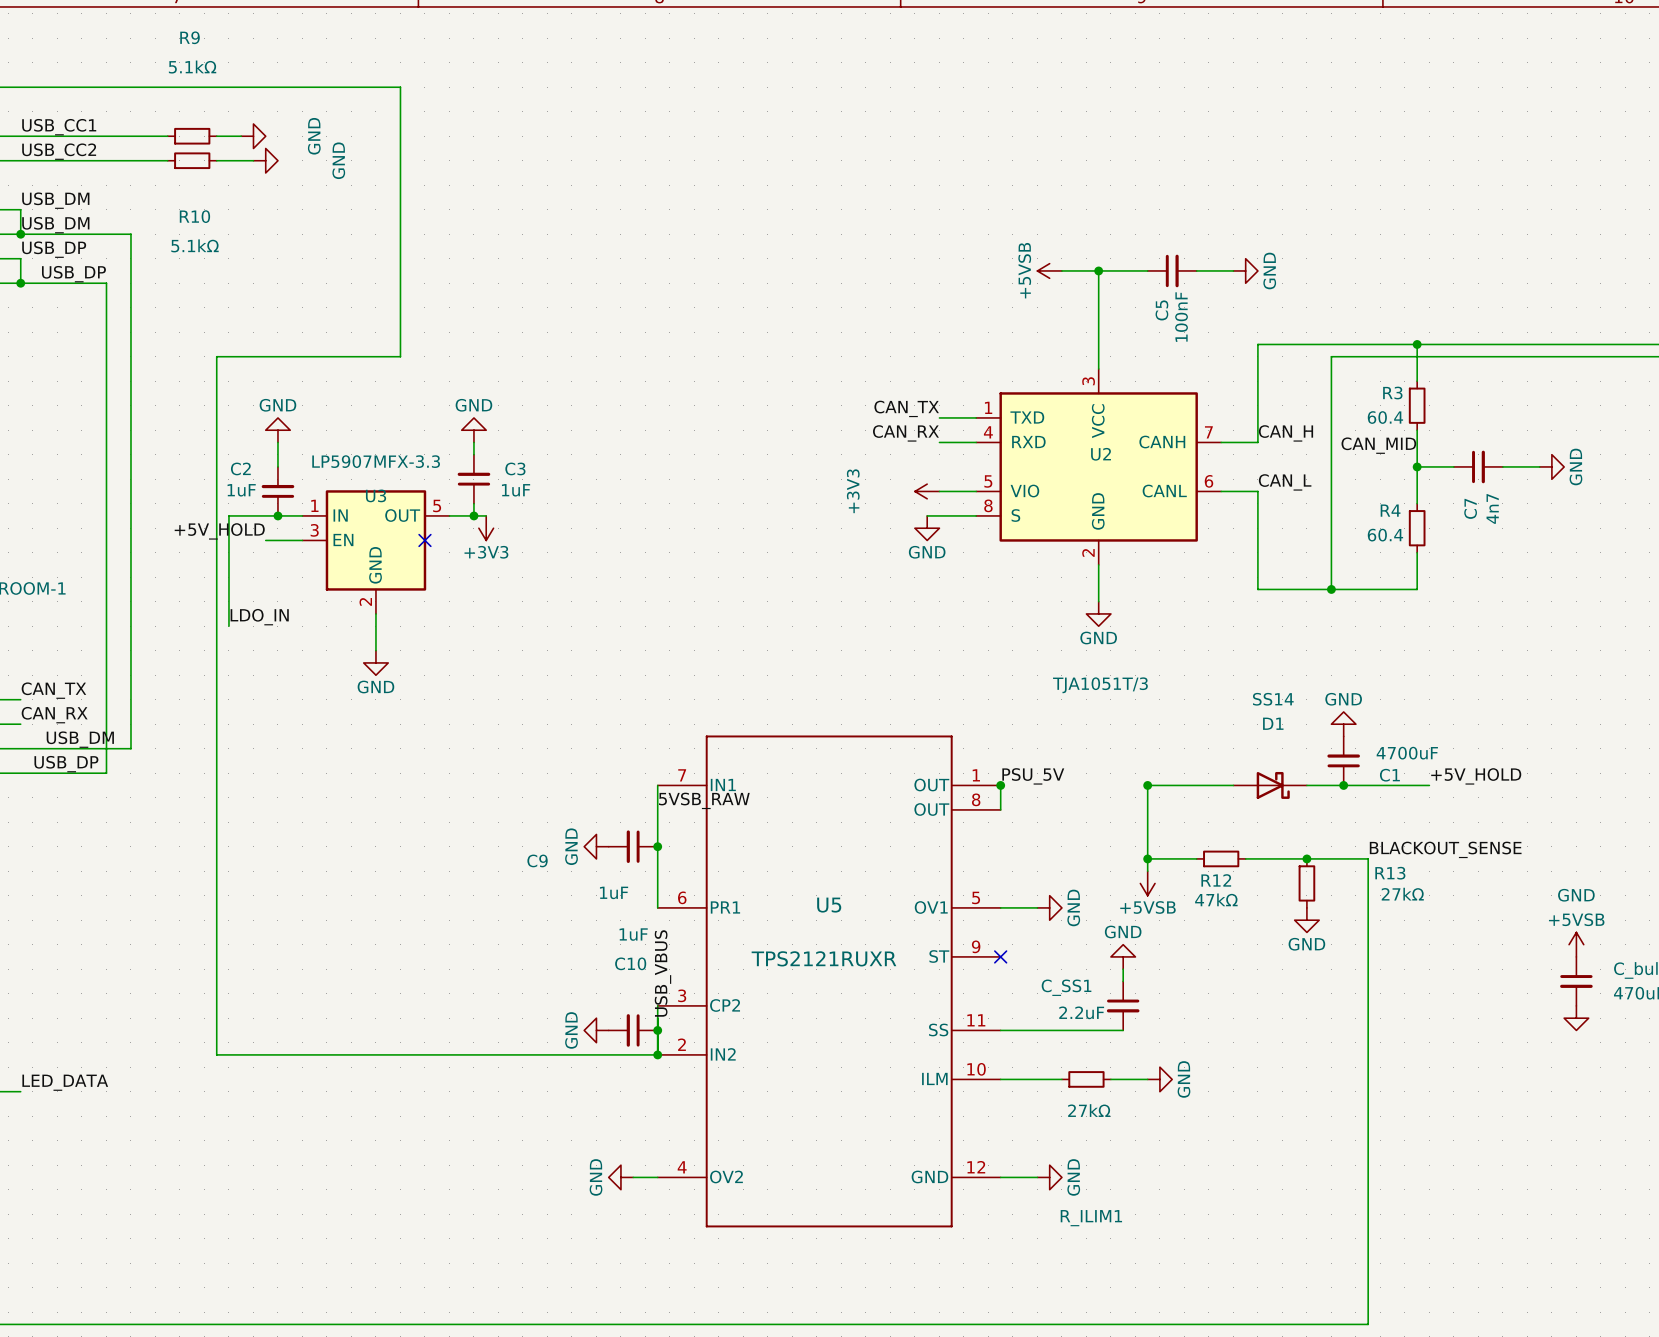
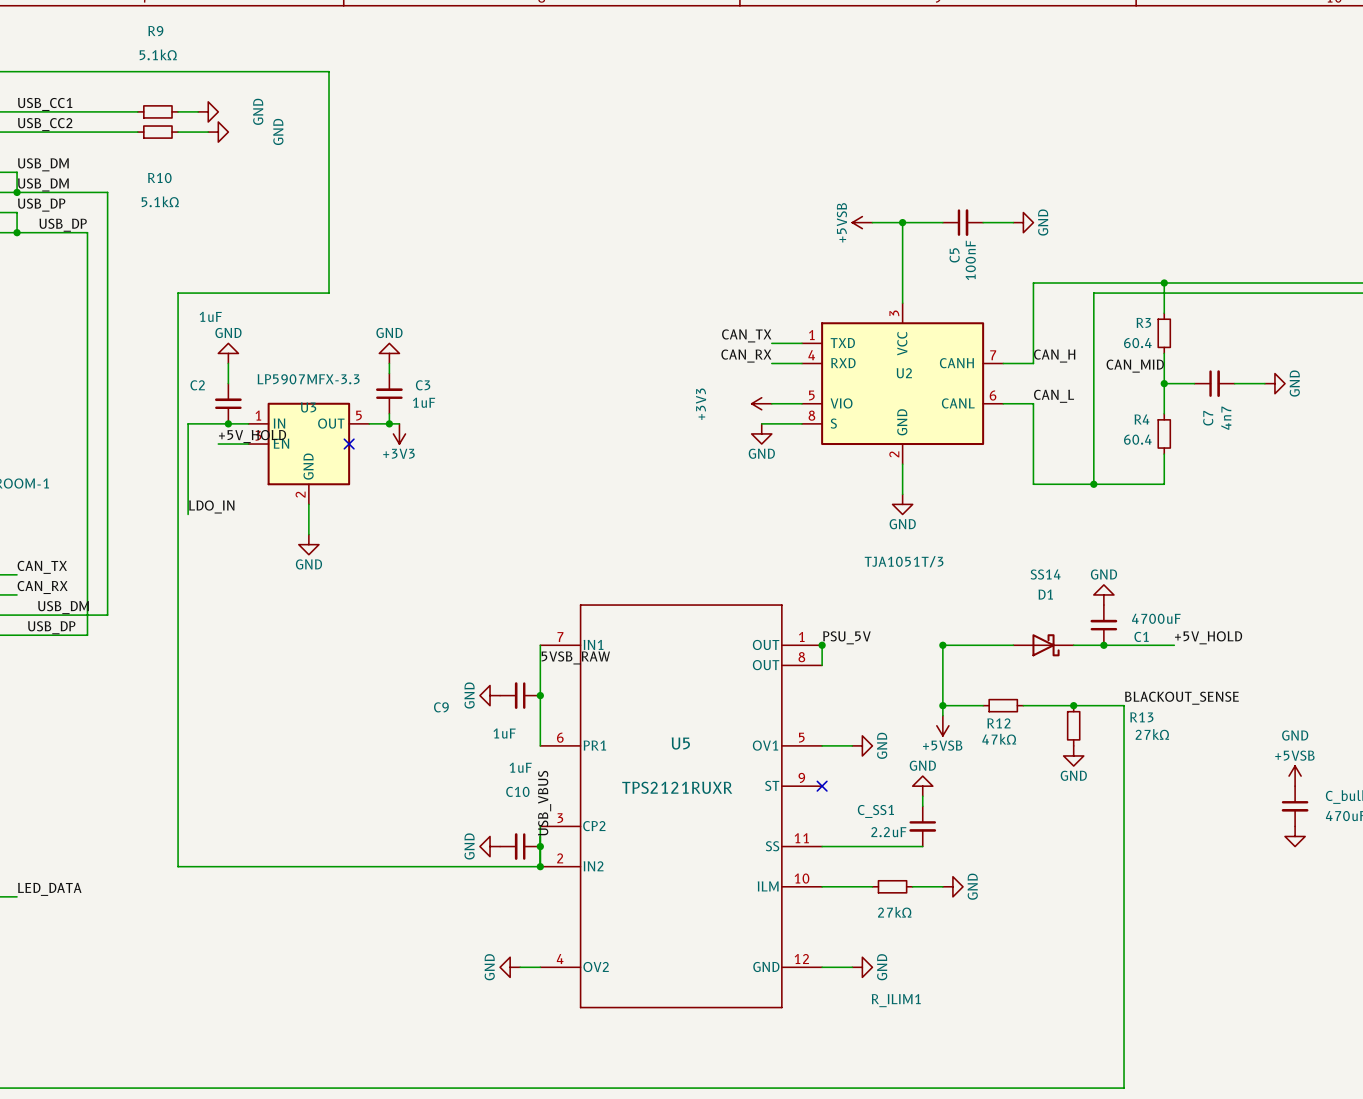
C2 value position: 1uF (241, 490) -> 1uF (210, 316)
label position: +5V_HOLD (219, 531) -> +5V_HOLD (252, 436)

